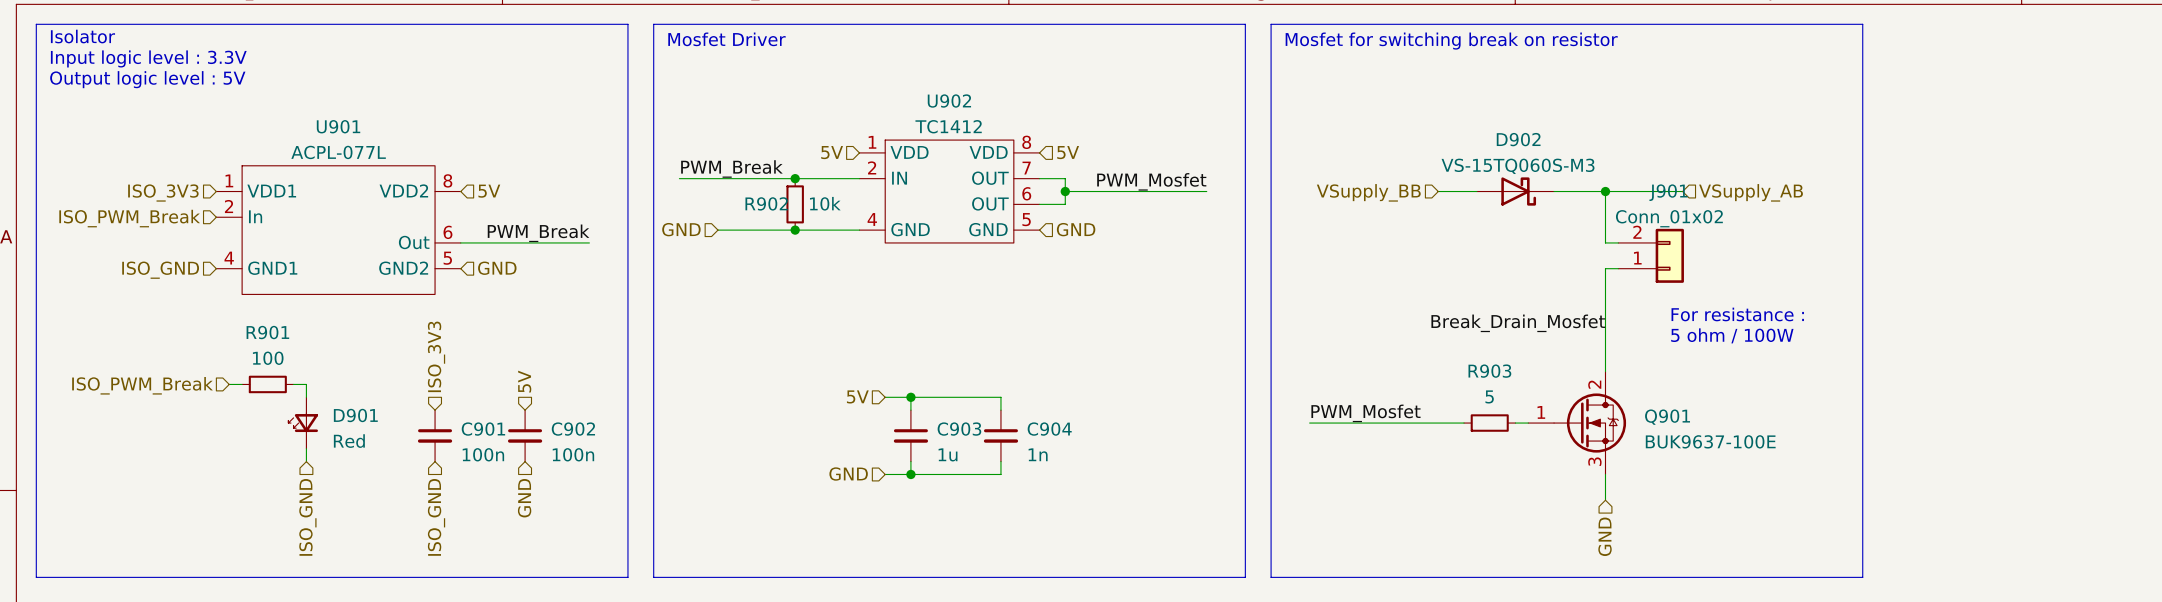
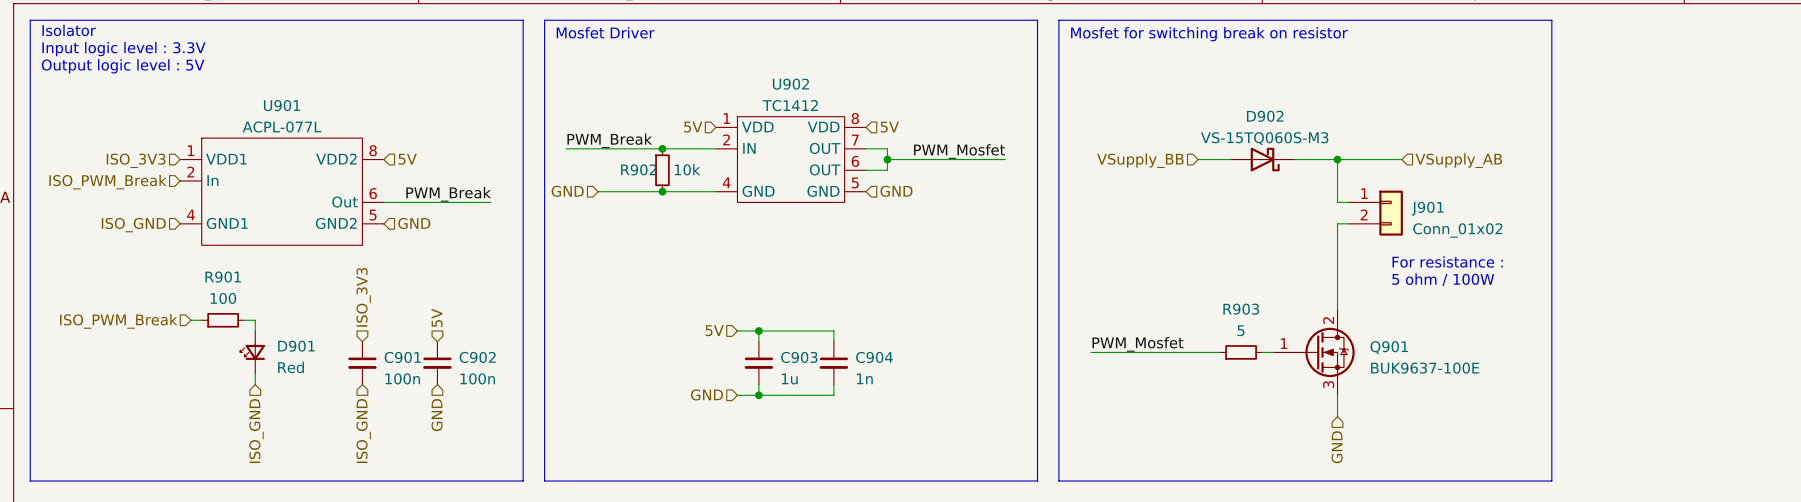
J901 name position: J901 (1668, 192) -> J901 (1427, 208)
J901 value position: Conn_01x02 (1669, 218) -> Conn_01x02 (1457, 230)
J901 flip: as is (1669, 255) -> up-down (1391, 213)
label: Break_Drain_Mosfet (1518, 323) -> none

